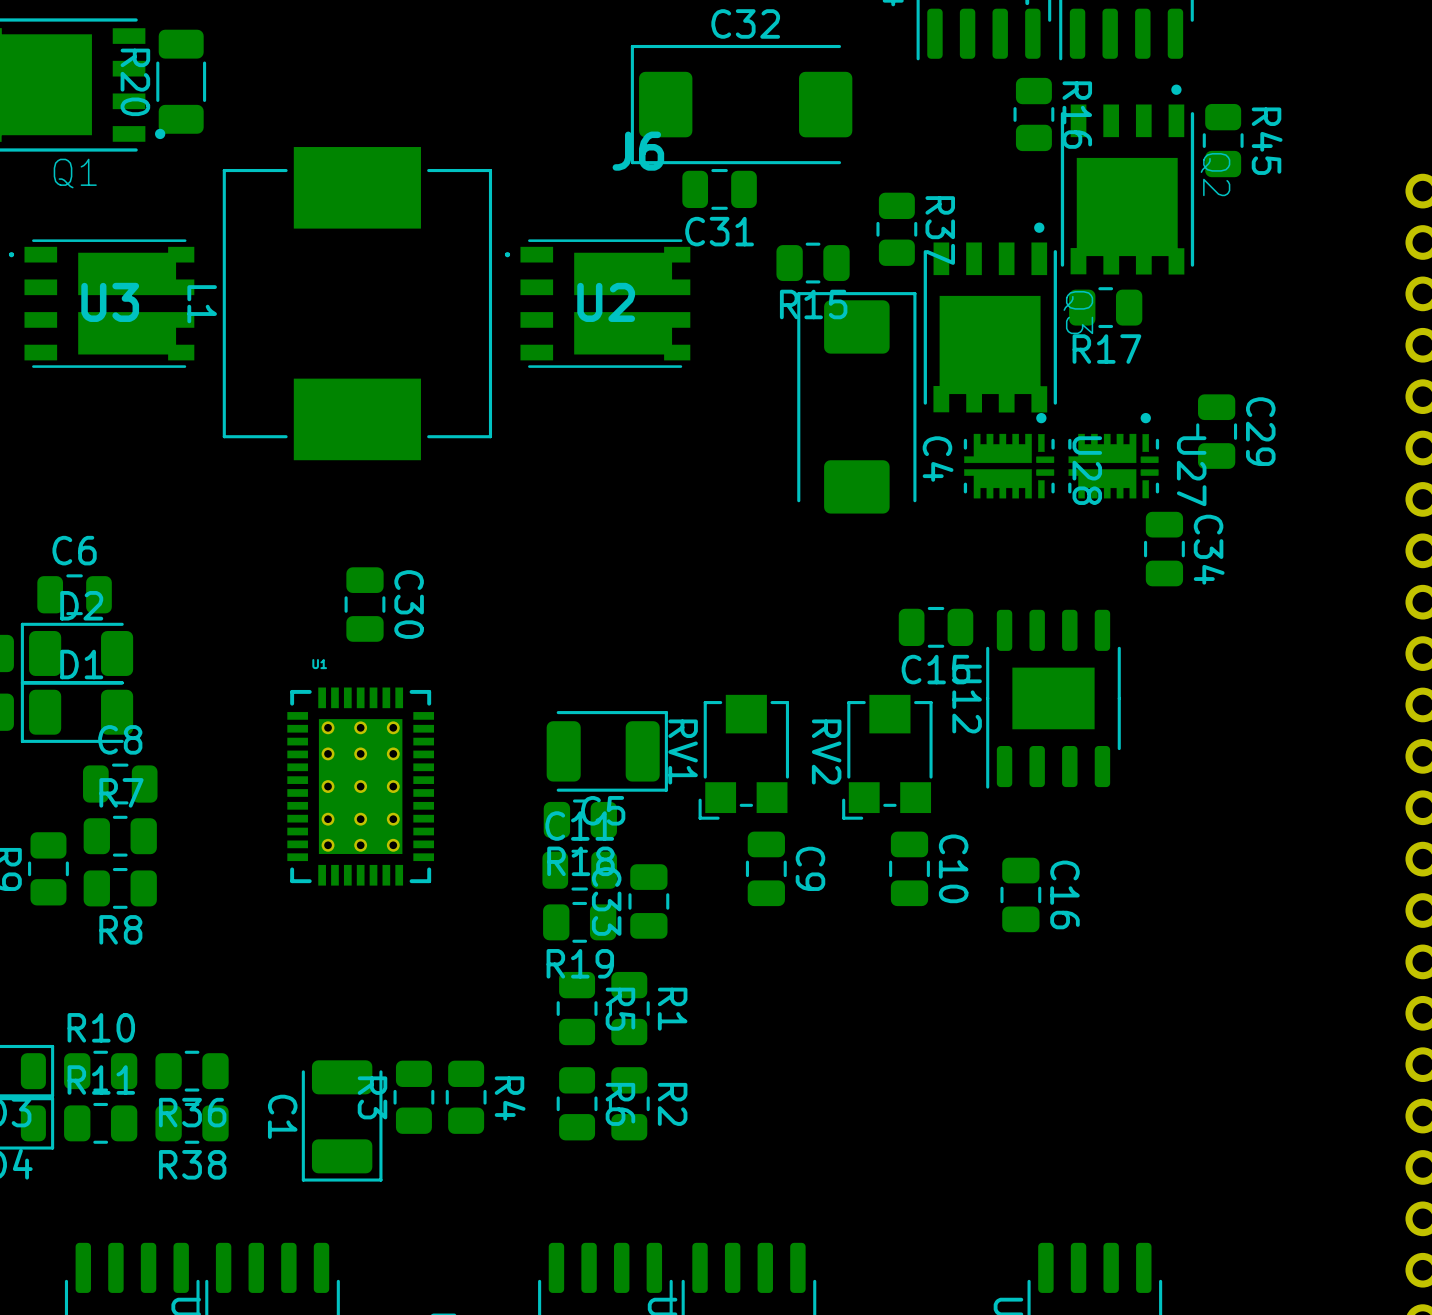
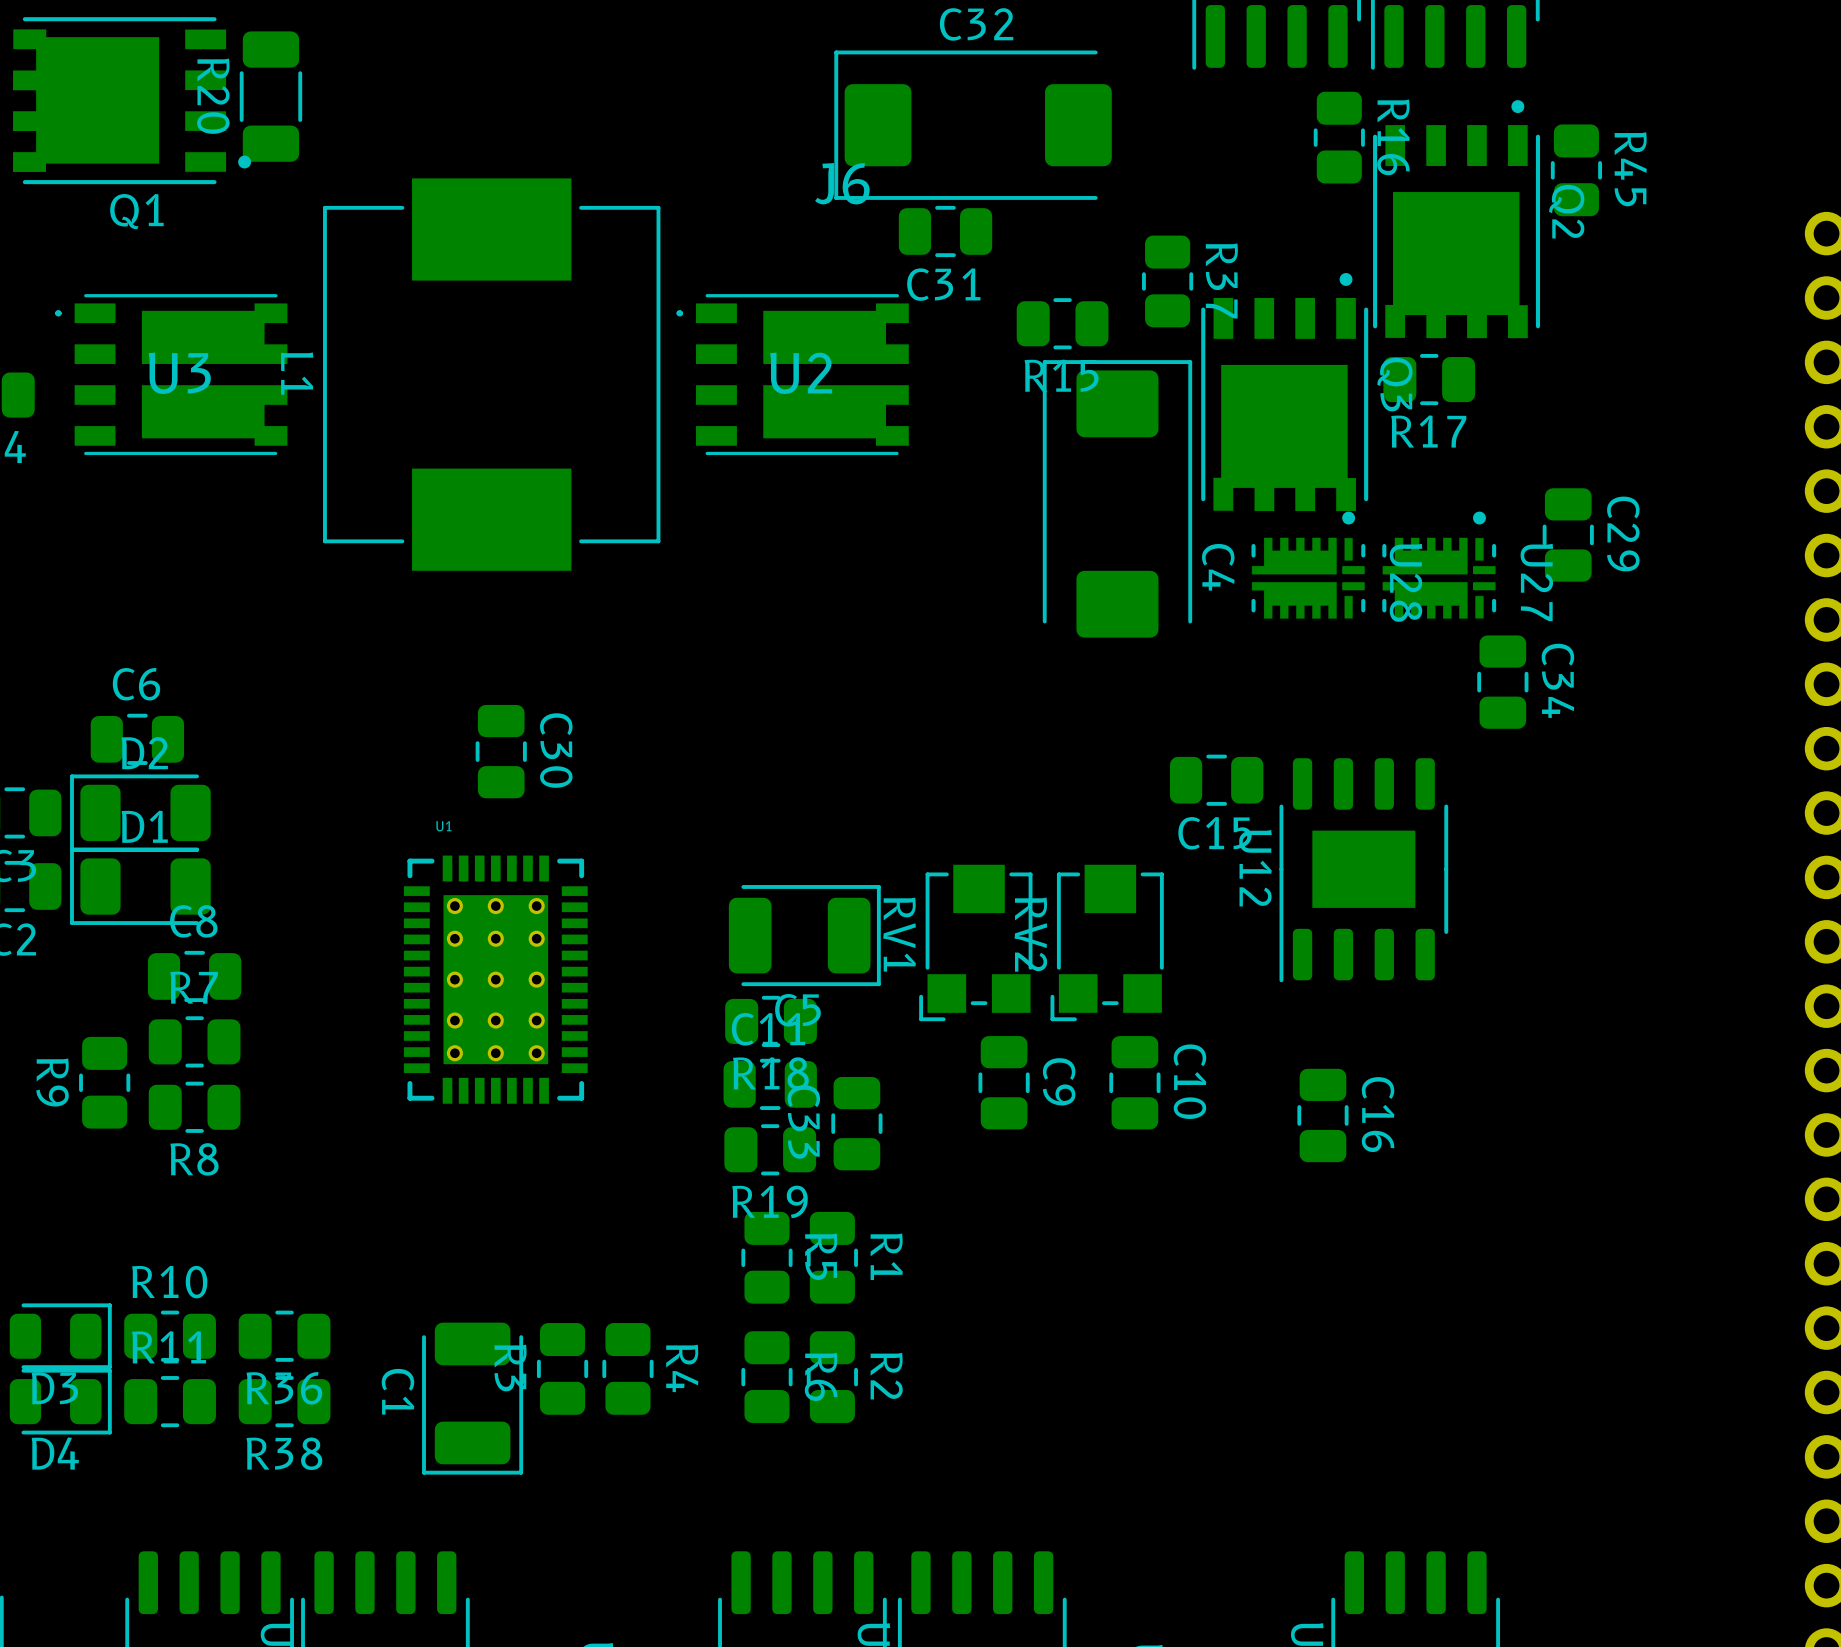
RV2 position: (887, 757) -> (1107, 942)
C10 position: (909, 868) -> (1134, 1082)

